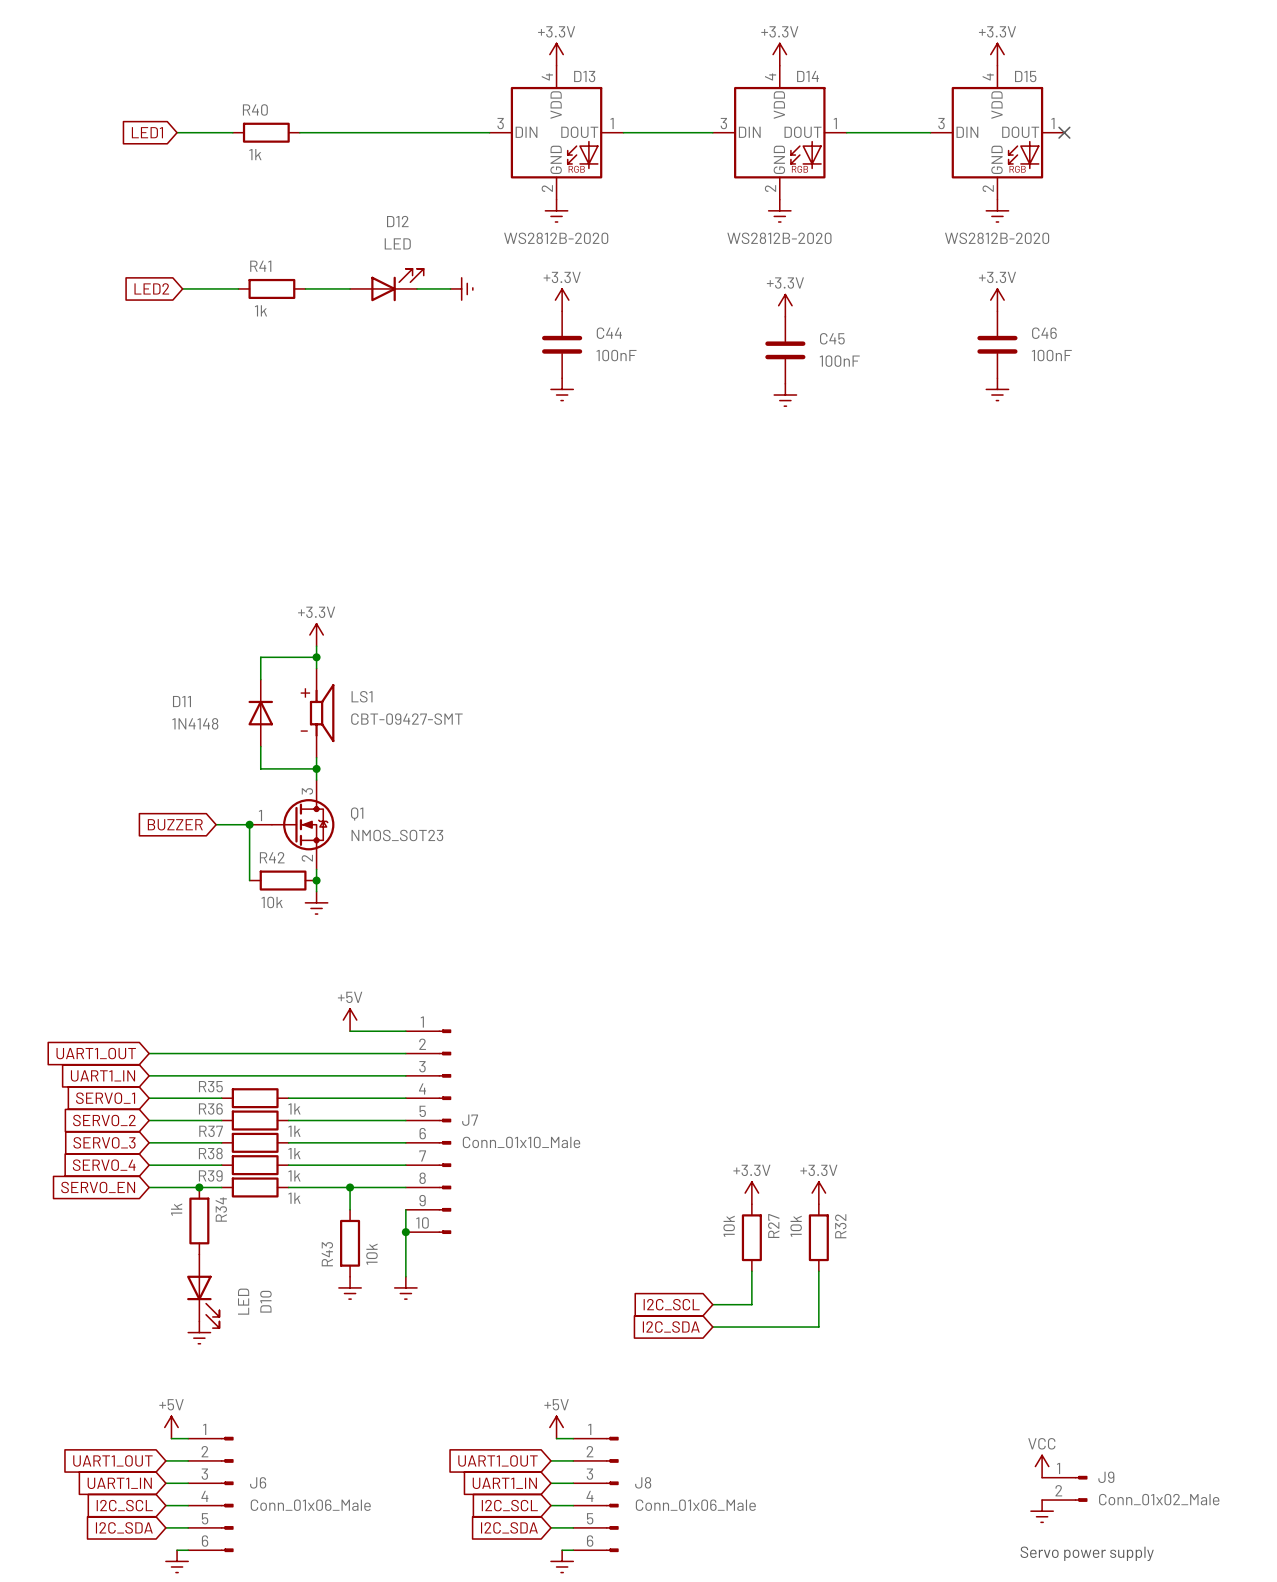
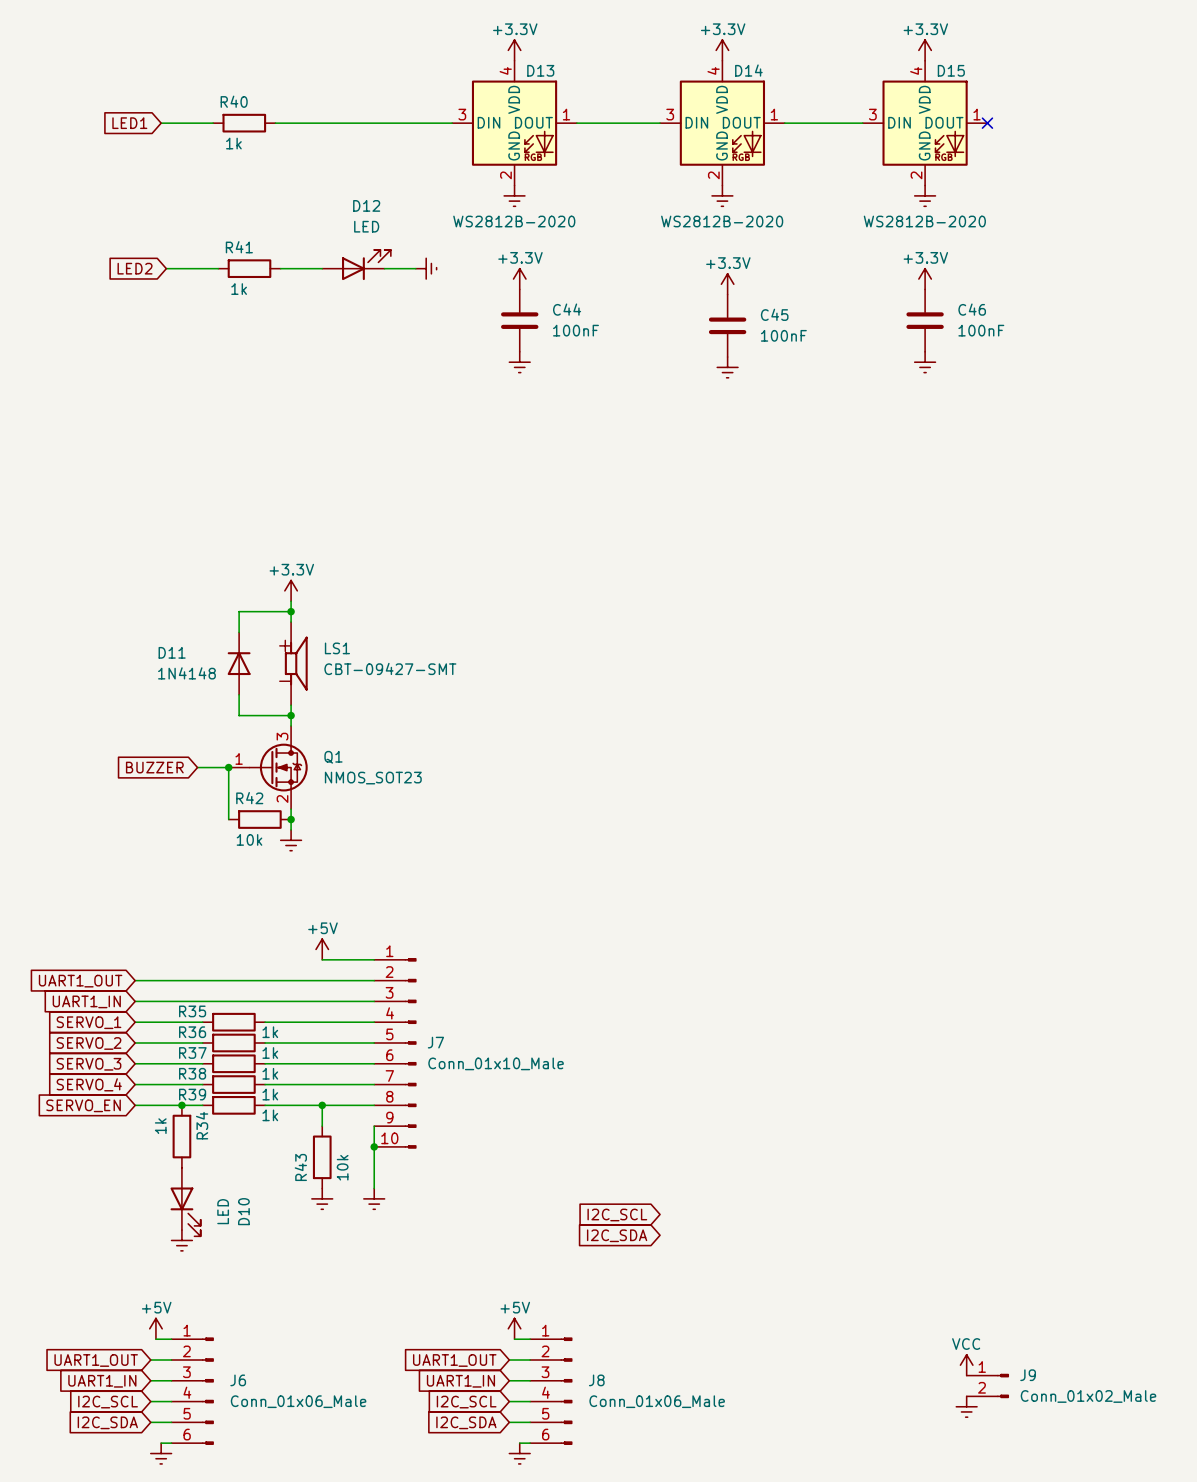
power symbol: +3.3V (751, 1193) -> none
power symbol: +3.3V (818, 1193) -> none
R27: 10k (751, 1237) -> none
R32: 10k (818, 1237) -> none
wire: (751, 1271) (751, 1304) (712, 1304) -> none
wire: (818, 1271) (818, 1327) (712, 1327) -> none
text: Servo power supply (1087, 1553) -> none

